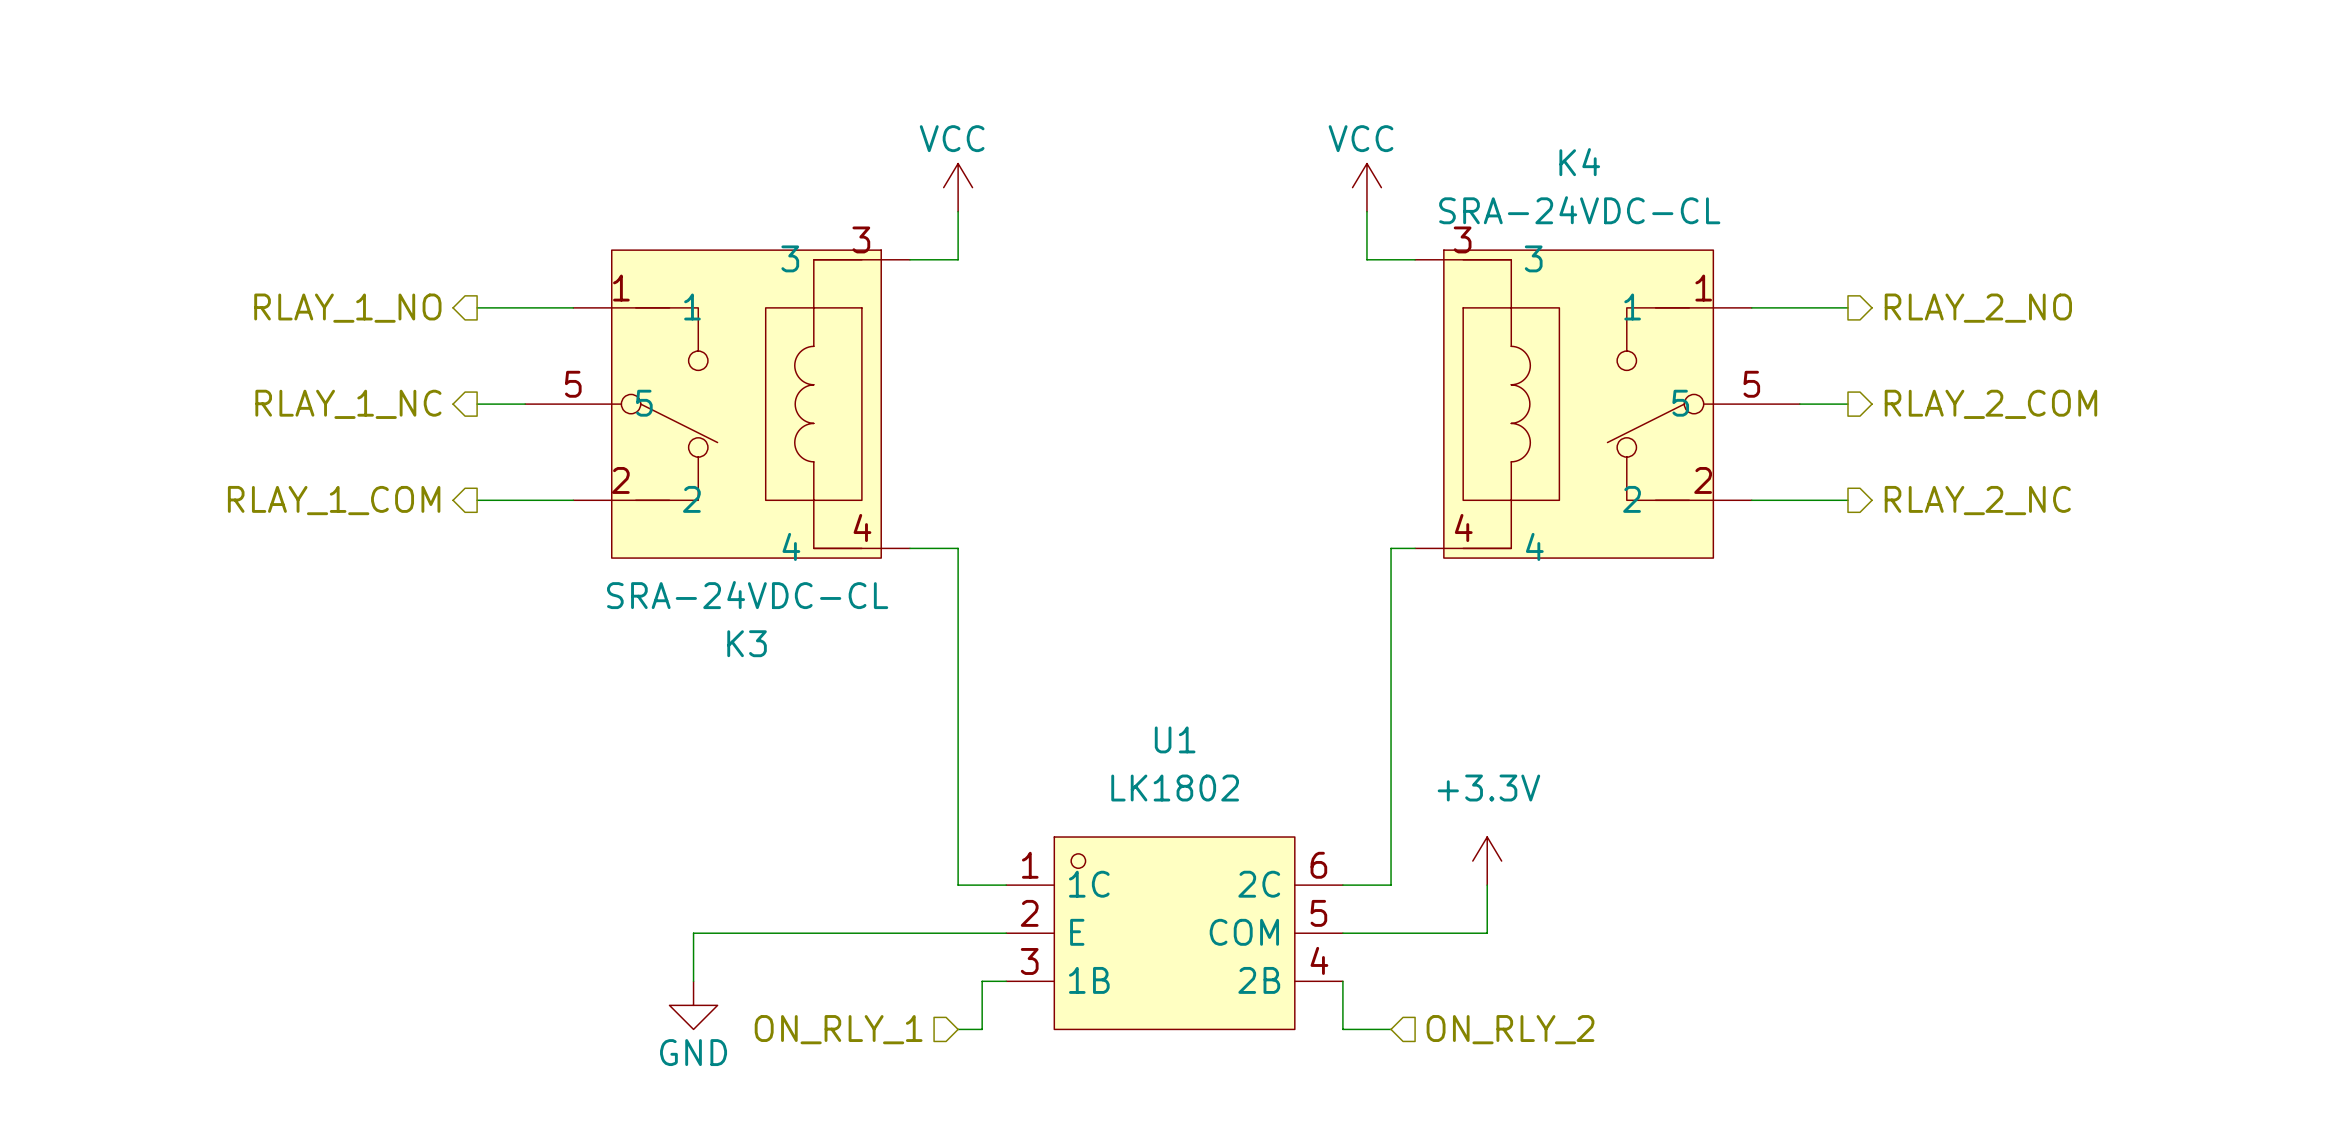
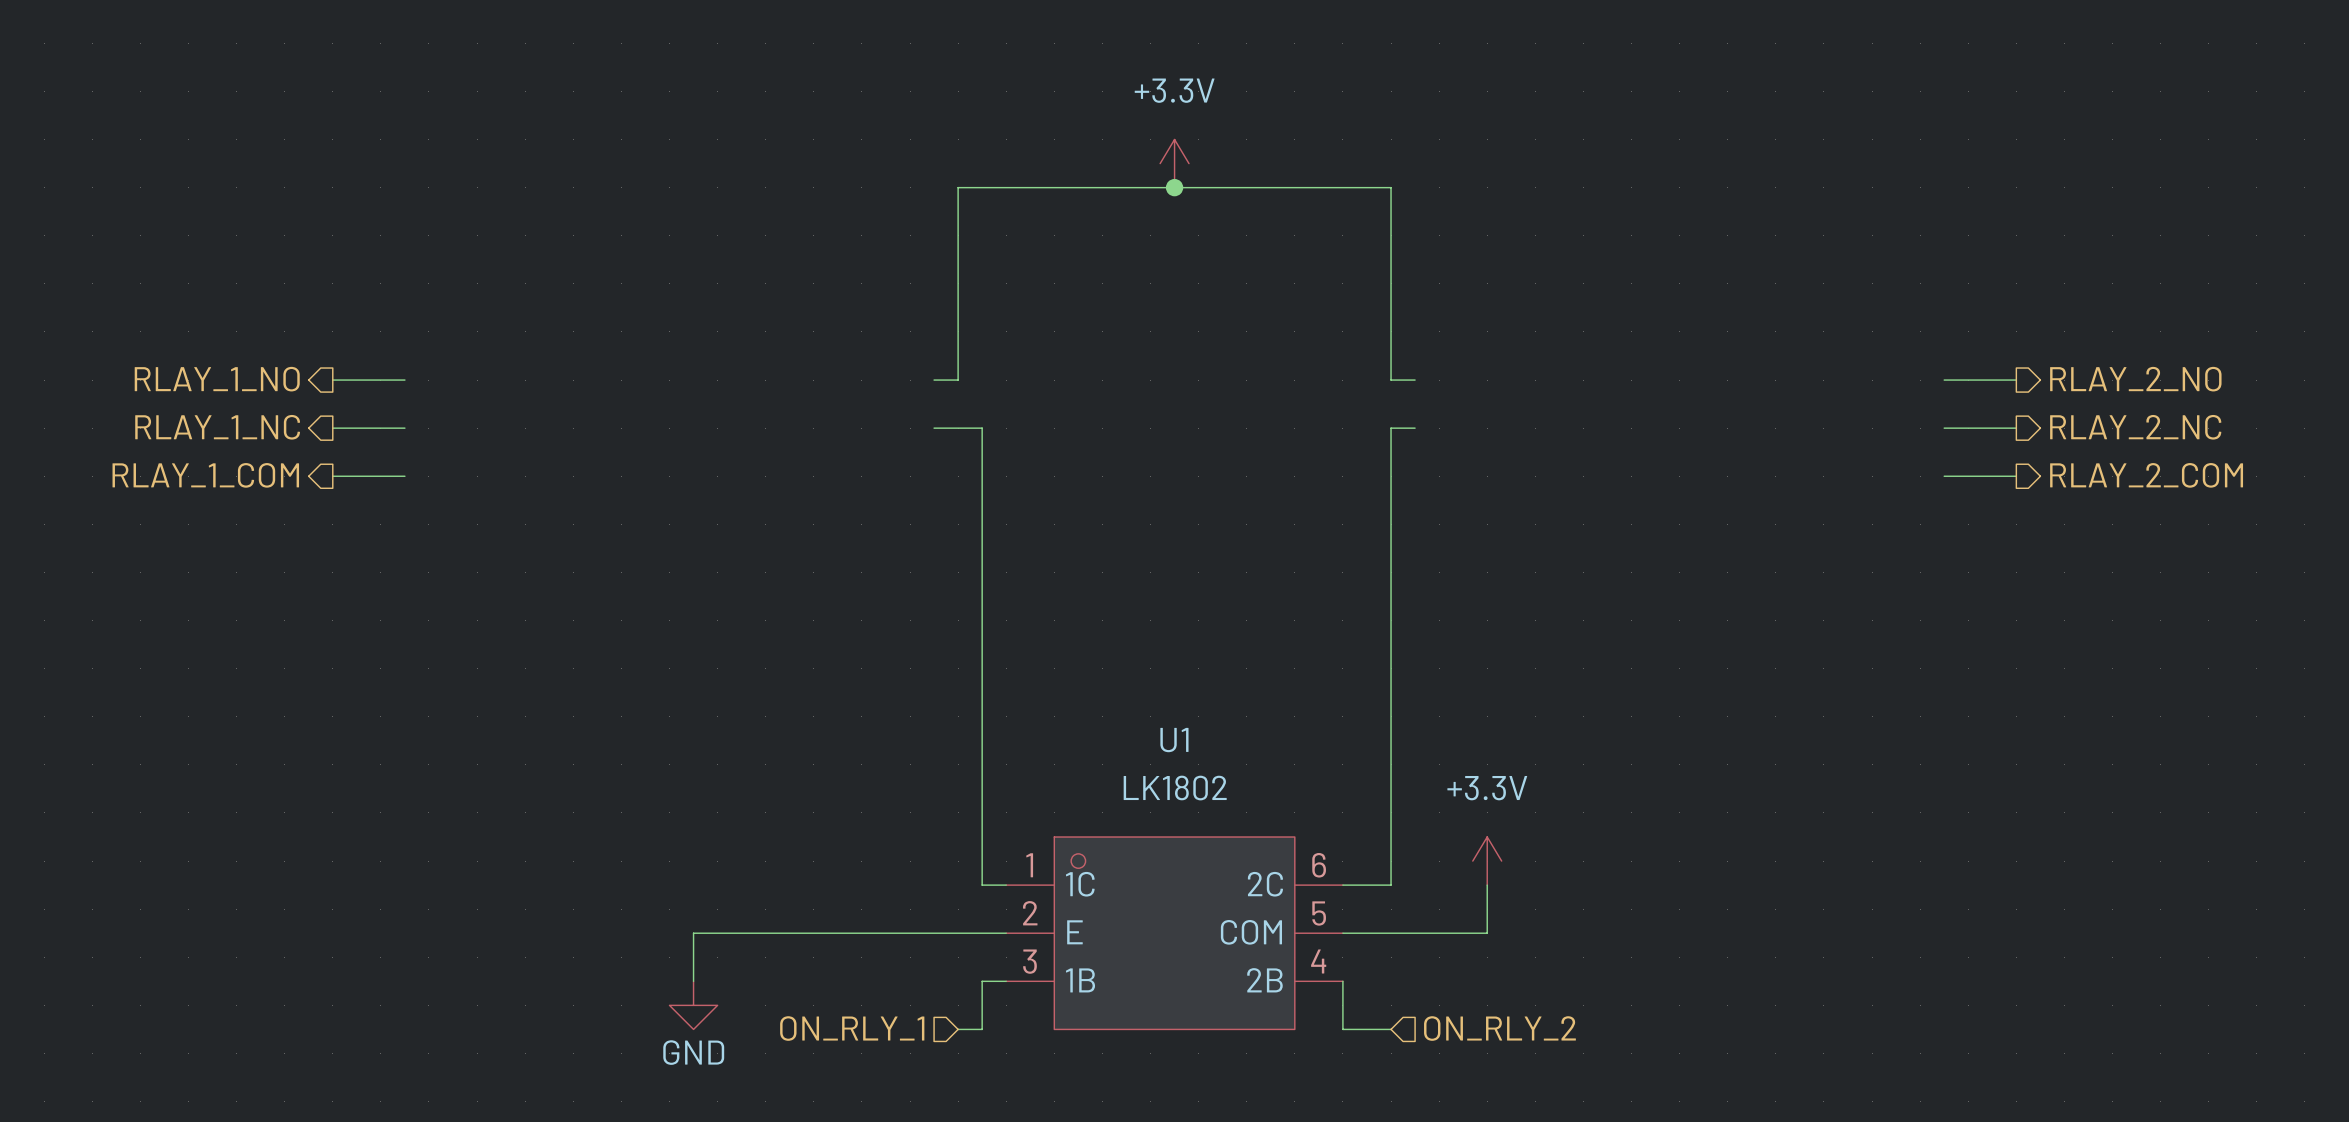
power symbol: none -> +3.3V (1174, 163)
power symbol: VCC (958, 187) -> none
junction: none -> (1174, 187)
power symbol: VCC (1366, 187) -> none
wire: none -> (958, 211) (958, 187) (1391, 187) (1391, 380) (1415, 380)
wire: (1366, 211) (1366, 259) (1415, 259) -> none
wire: (910, 259) (958, 259) -> (934, 380) (958, 380) (958, 259)
wire: (477, 307) (573, 307) -> none
wire: (1751, 307) (1847, 307) -> none
hierarchical label position: RLAY_1_NO (347, 308) -> RLAY_1_NO (217, 379)
hierarchical label position: RLAY_2_NO (1978, 308) -> RLAY_2_NO (2135, 379)
wire: none -> (332, 380) (404, 380)
wire: none -> (1944, 380) (2016, 380)
hierarchical label position: RLAY_1_NC (348, 404) -> RLAY_1_NC (217, 427)
wire: (477, 404) (525, 404) -> none
K3: SRA-24VDC-CL (717, 404) -> none
K4: SRA-24VDC-CL (1607, 404) -> none
wire: (1799, 404) (1847, 404) -> none
hierarchical label position: RLAY_2_COM (1990, 404) -> RLAY_2_COM (2146, 475)
wire: none -> (332, 428) (404, 428)
wire: none -> (1944, 428) (2016, 428)
wire: none -> (332, 476) (404, 476)
wire: none -> (1944, 476) (2016, 476)
hierarchical label position: RLAY_1_COM (334, 500) -> RLAY_1_COM (205, 475)
wire: (477, 500) (573, 500) -> none
wire: (1751, 500) (1847, 500) -> none
hierarchical label position: RLAY_2_NC (1977, 500) -> RLAY_2_NC (2135, 427)
wire: (910, 548) (958, 548) (958, 885) (982, 885) -> (934, 428) (982, 428) (982, 885)
wire: (1391, 548) (1415, 548) -> (1391, 548) (1391, 428) (1415, 428)

